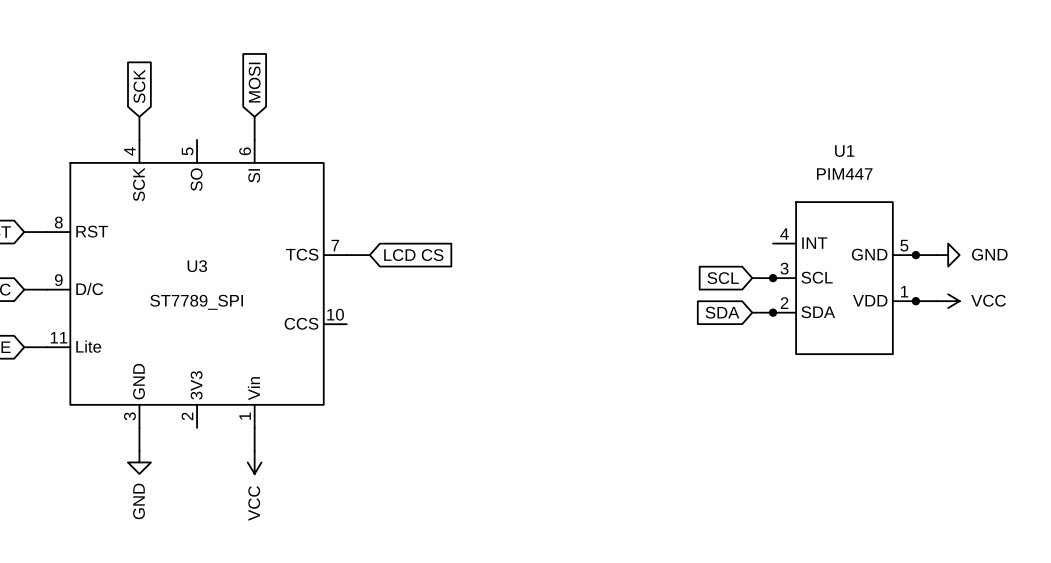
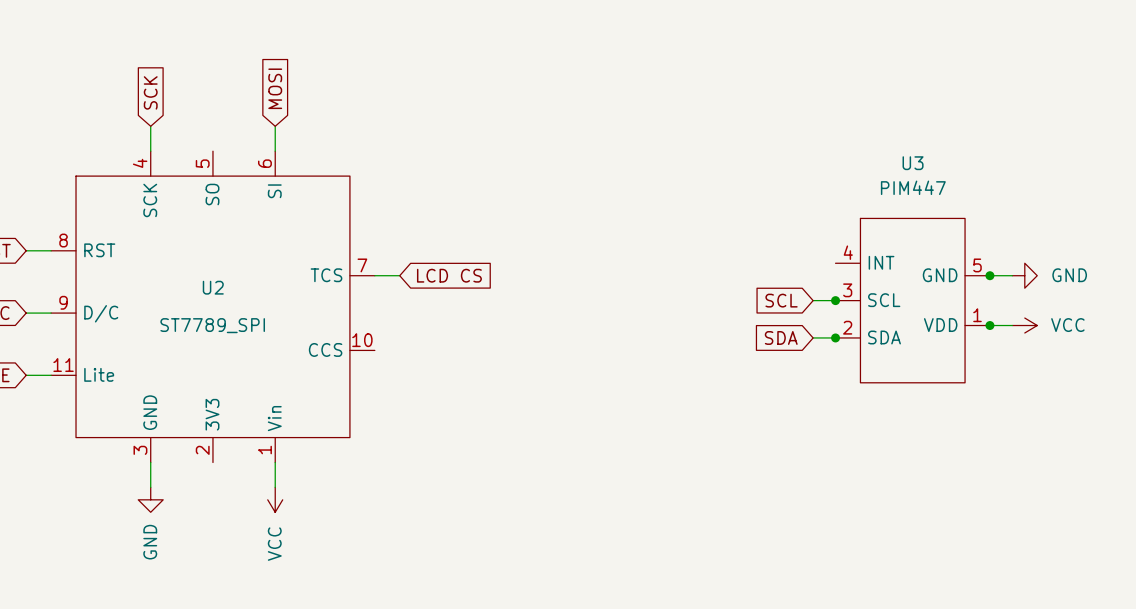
U1 name: U1 (844, 151) -> U3 (913, 163)
U3 name: U3 (197, 266) -> U2 (213, 287)

